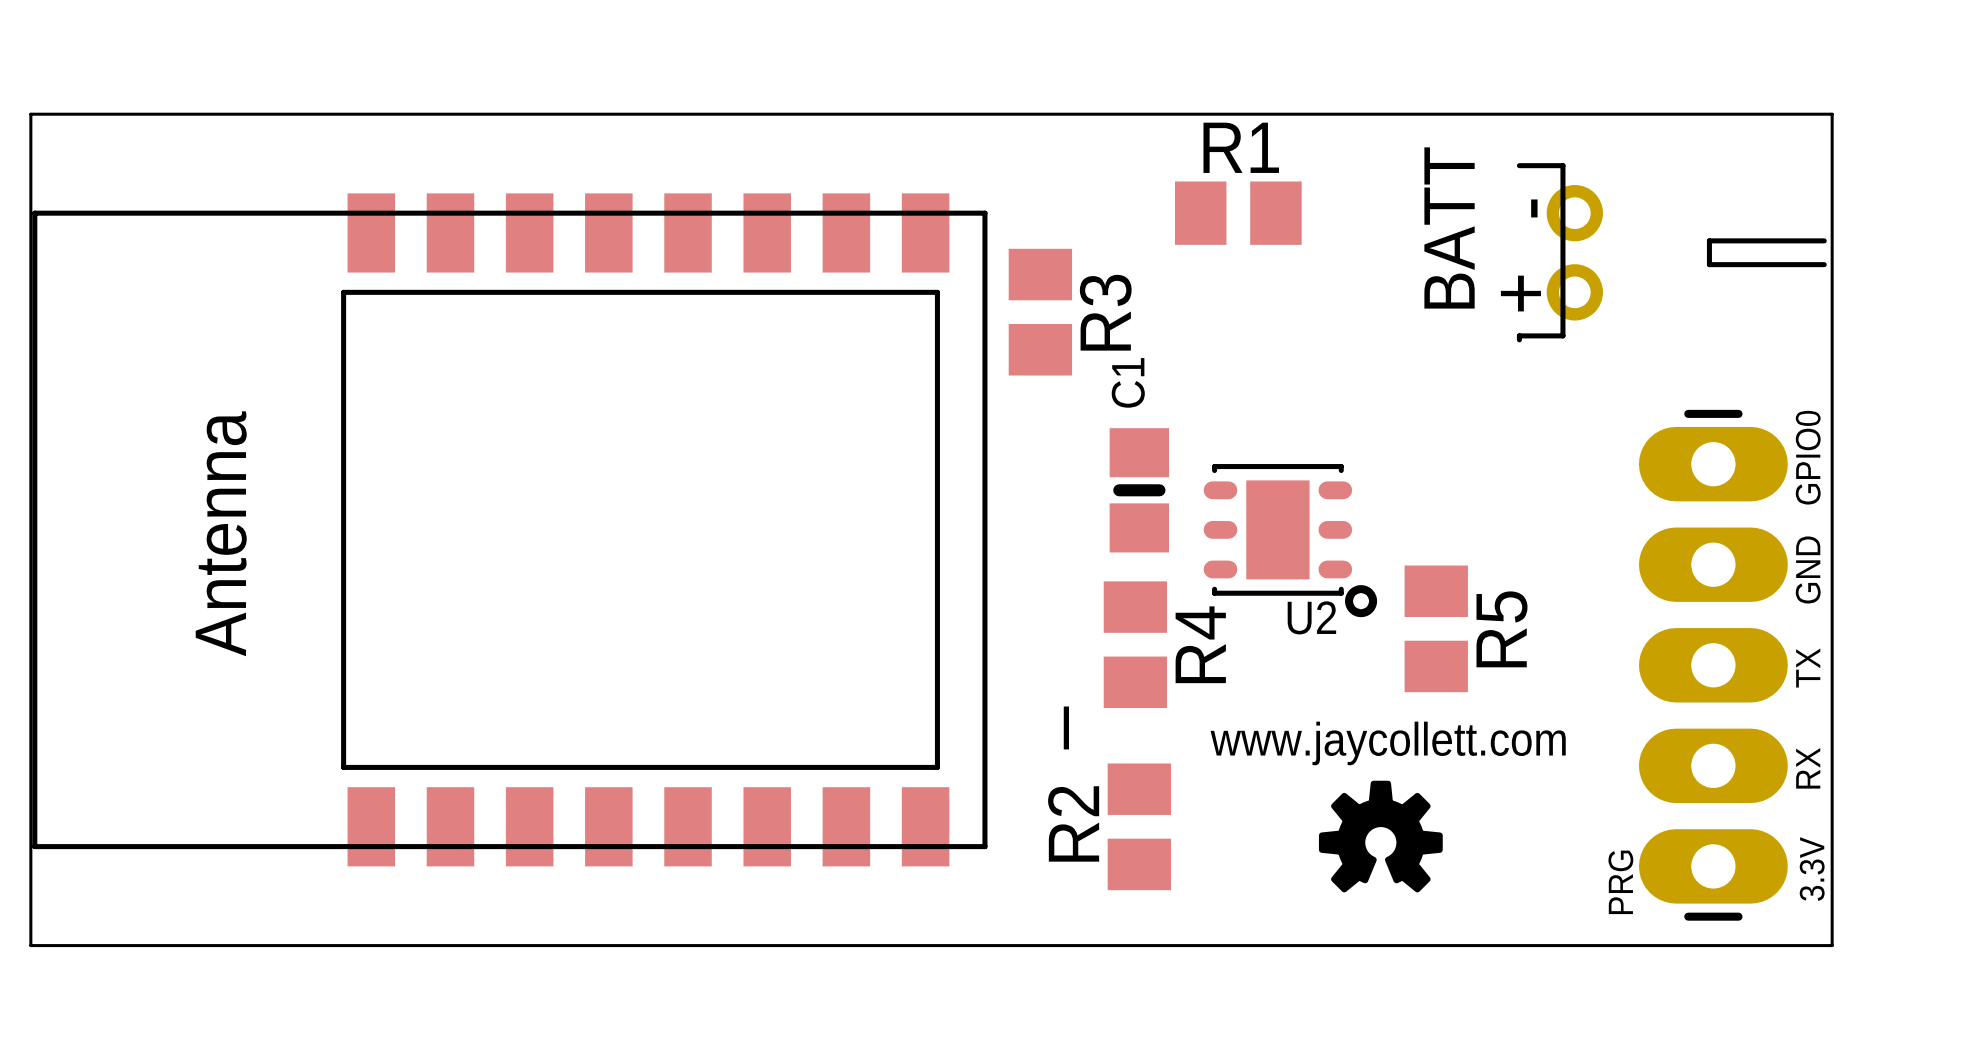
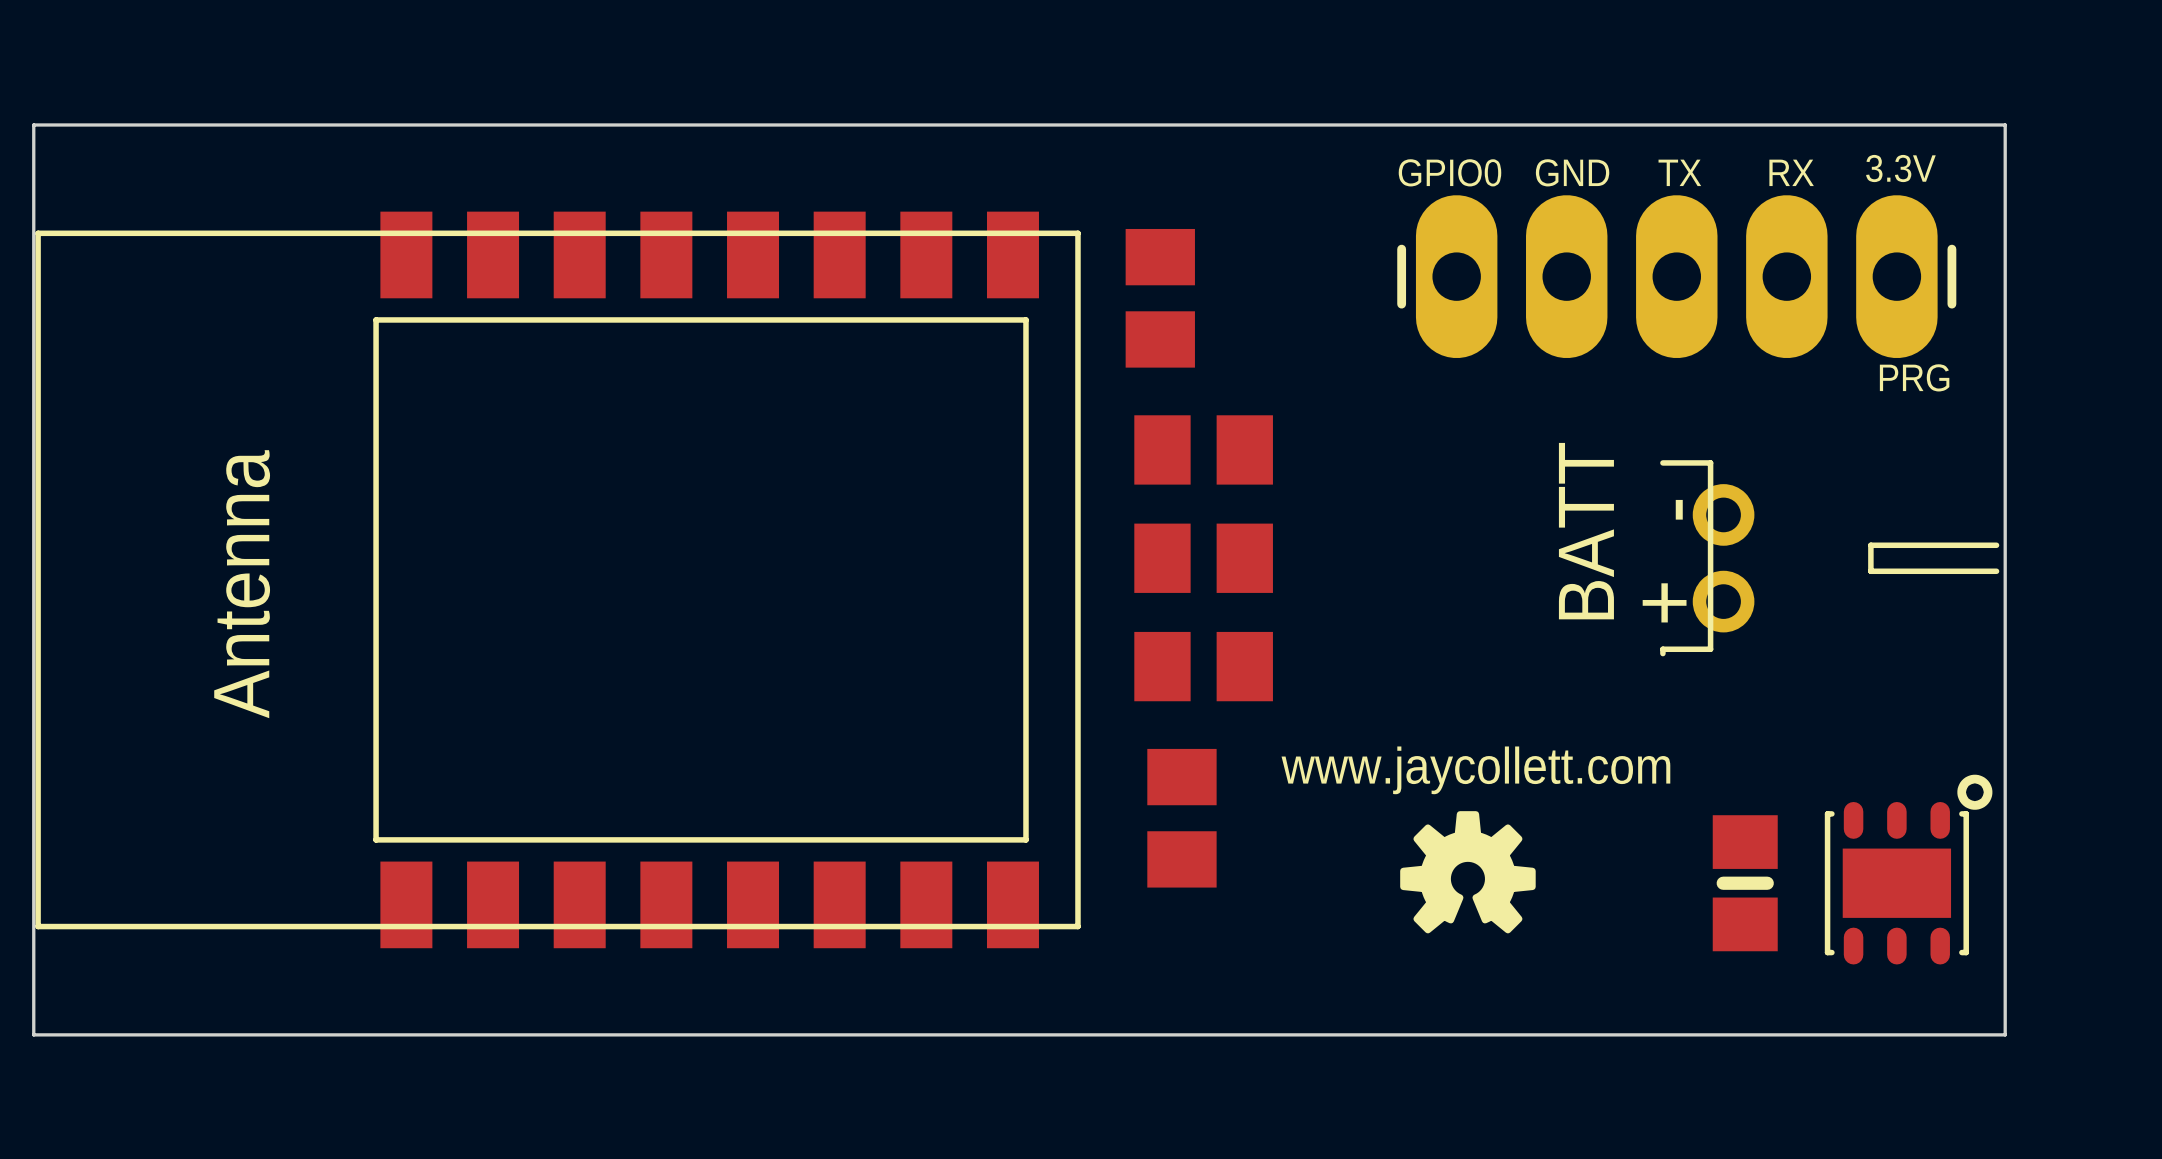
R1: (1238, 213) -> none
BATT position: (1671, 252) -> (1829, 558)
part: none -> (1160, 298)
R3: (1040, 312) -> none
part: none -> (1203, 449)
text rotation: 0° (1808, 457) -> 90° clockwise (1449, 172)
text position: GPIO0 (1808, 457) -> GPIO0 (1449, 172)
C1: (1139, 490) -> none
part: none -> (1203, 558)
U2: (1290, 540) -> none
text rotation: 0° (1808, 569) -> 90° clockwise (1572, 172)
text position: GND (1808, 569) -> GND (1572, 172)
part: none -> (1203, 666)
R5: (1436, 628) -> none
R4: (1135, 644) -> none
PRG rotation: 0° (1713, 665) -> 90° clockwise (1676, 276)
PRG position: (1713, 665) -> (1676, 276)
text rotation: 0° (1808, 668) -> 90° clockwise (1679, 172)
text position: TX (1808, 668) -> TX (1679, 172)
part name: _ (1066, 727) -> none
text position: www.jaycollett.com (1388, 743) -> www.jaycollett.com (1475, 770)
part: none -> (1181, 818)
text rotation: 0° (1808, 768) -> 90° clockwise (1791, 172)
text position: RX (1808, 768) -> RX (1791, 172)
part: none -> (1908, 869)
part: none -> (1745, 883)
R2: (1139, 826) -> none
drawing position: (1380, 836) -> (1467, 872)
text rotation: 0° (1812, 869) -> 90° clockwise (1900, 168)
text position: 3.3V (1812, 869) -> 3.3V (1900, 168)
PRG name position: PRG (1620, 882) -> PRG (1914, 377)

